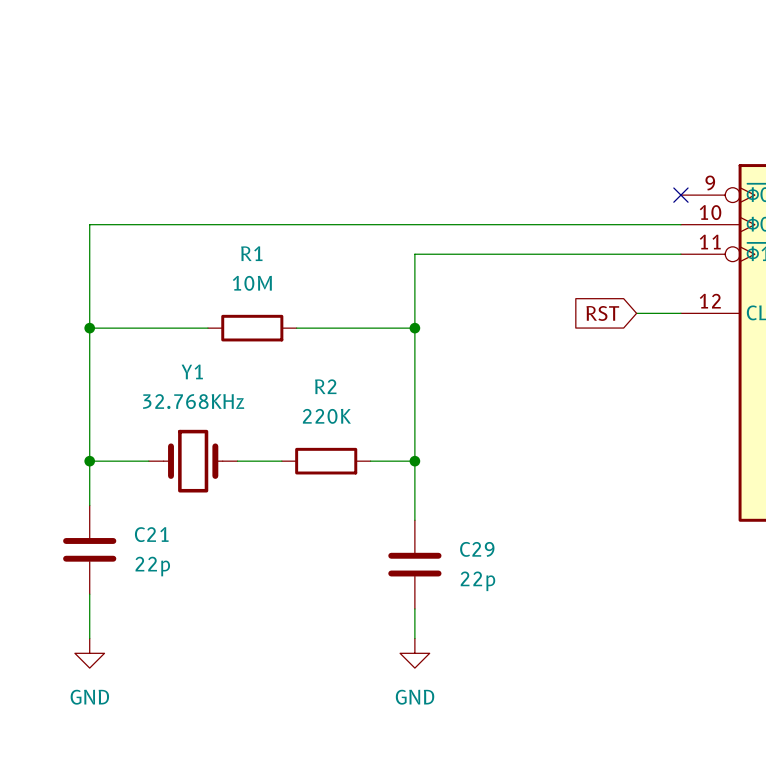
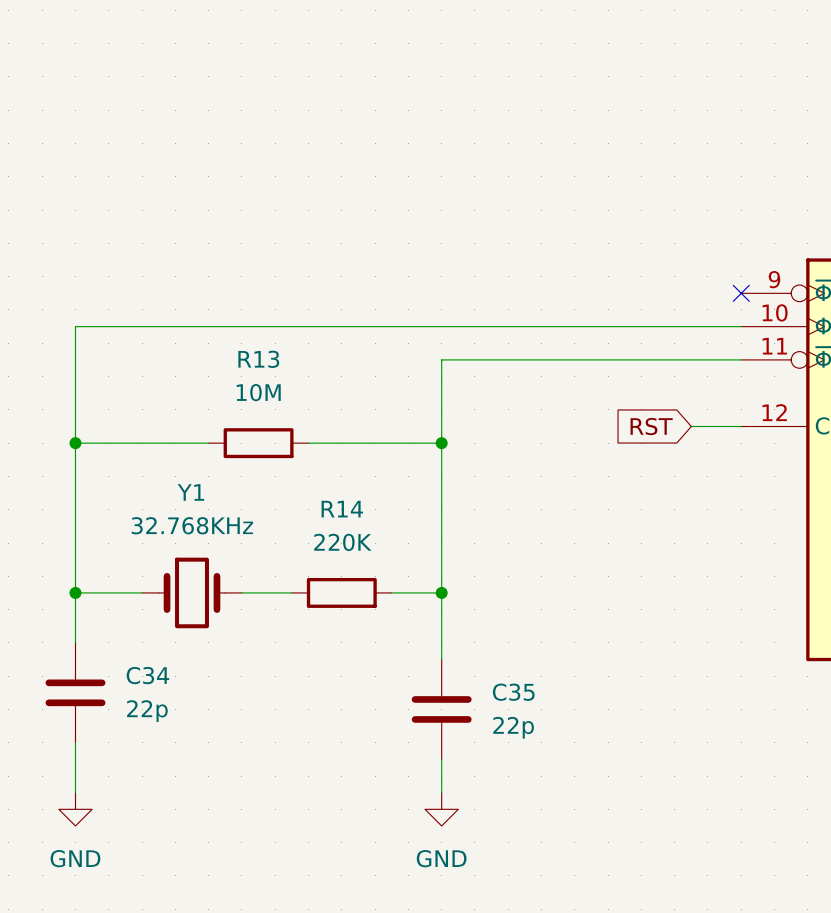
R1 name: R1 (251, 253) -> R13 (258, 359)
R2 name: R2 (325, 386) -> R14 (342, 509)
C21 name: C21 (151, 534) -> C34 (147, 675)
C29 name: C29 (477, 549) -> C35 (513, 692)

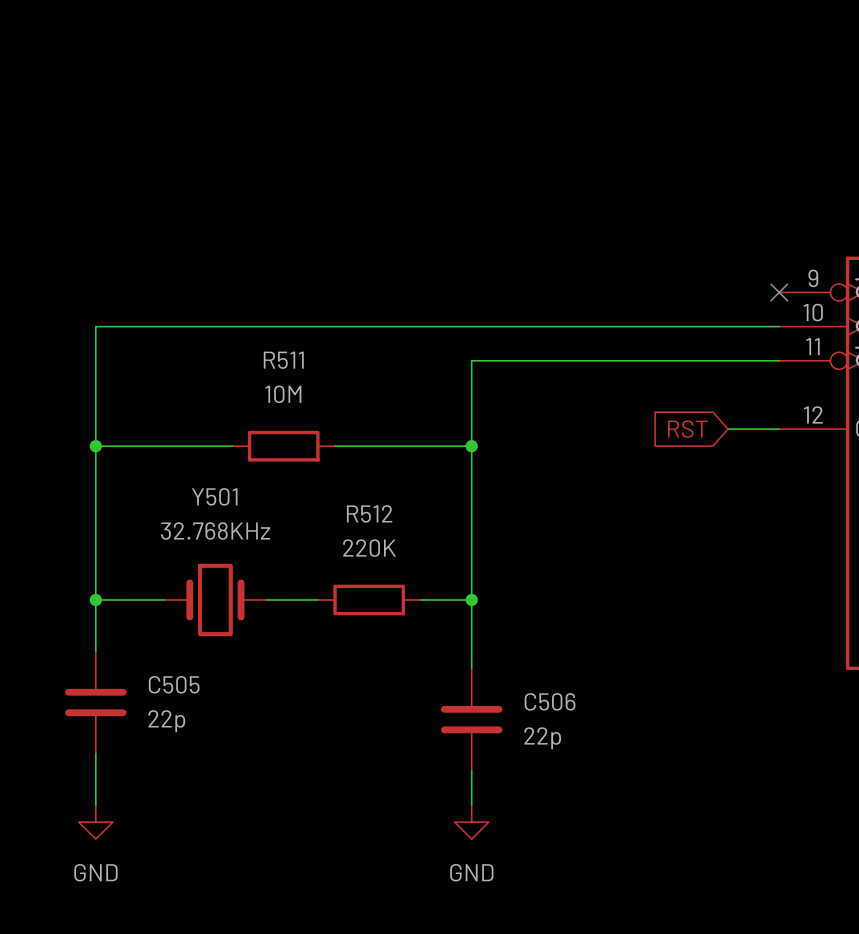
R13 name: R13 (258, 359) -> R511 (283, 360)
Y1 name: Y1 (190, 492) -> Y501 (214, 496)
R14 name: R14 (342, 509) -> R512 (369, 513)
C34 name: C34 (147, 675) -> C505 (174, 684)
C35 name: C35 (513, 692) -> C506 (550, 701)

